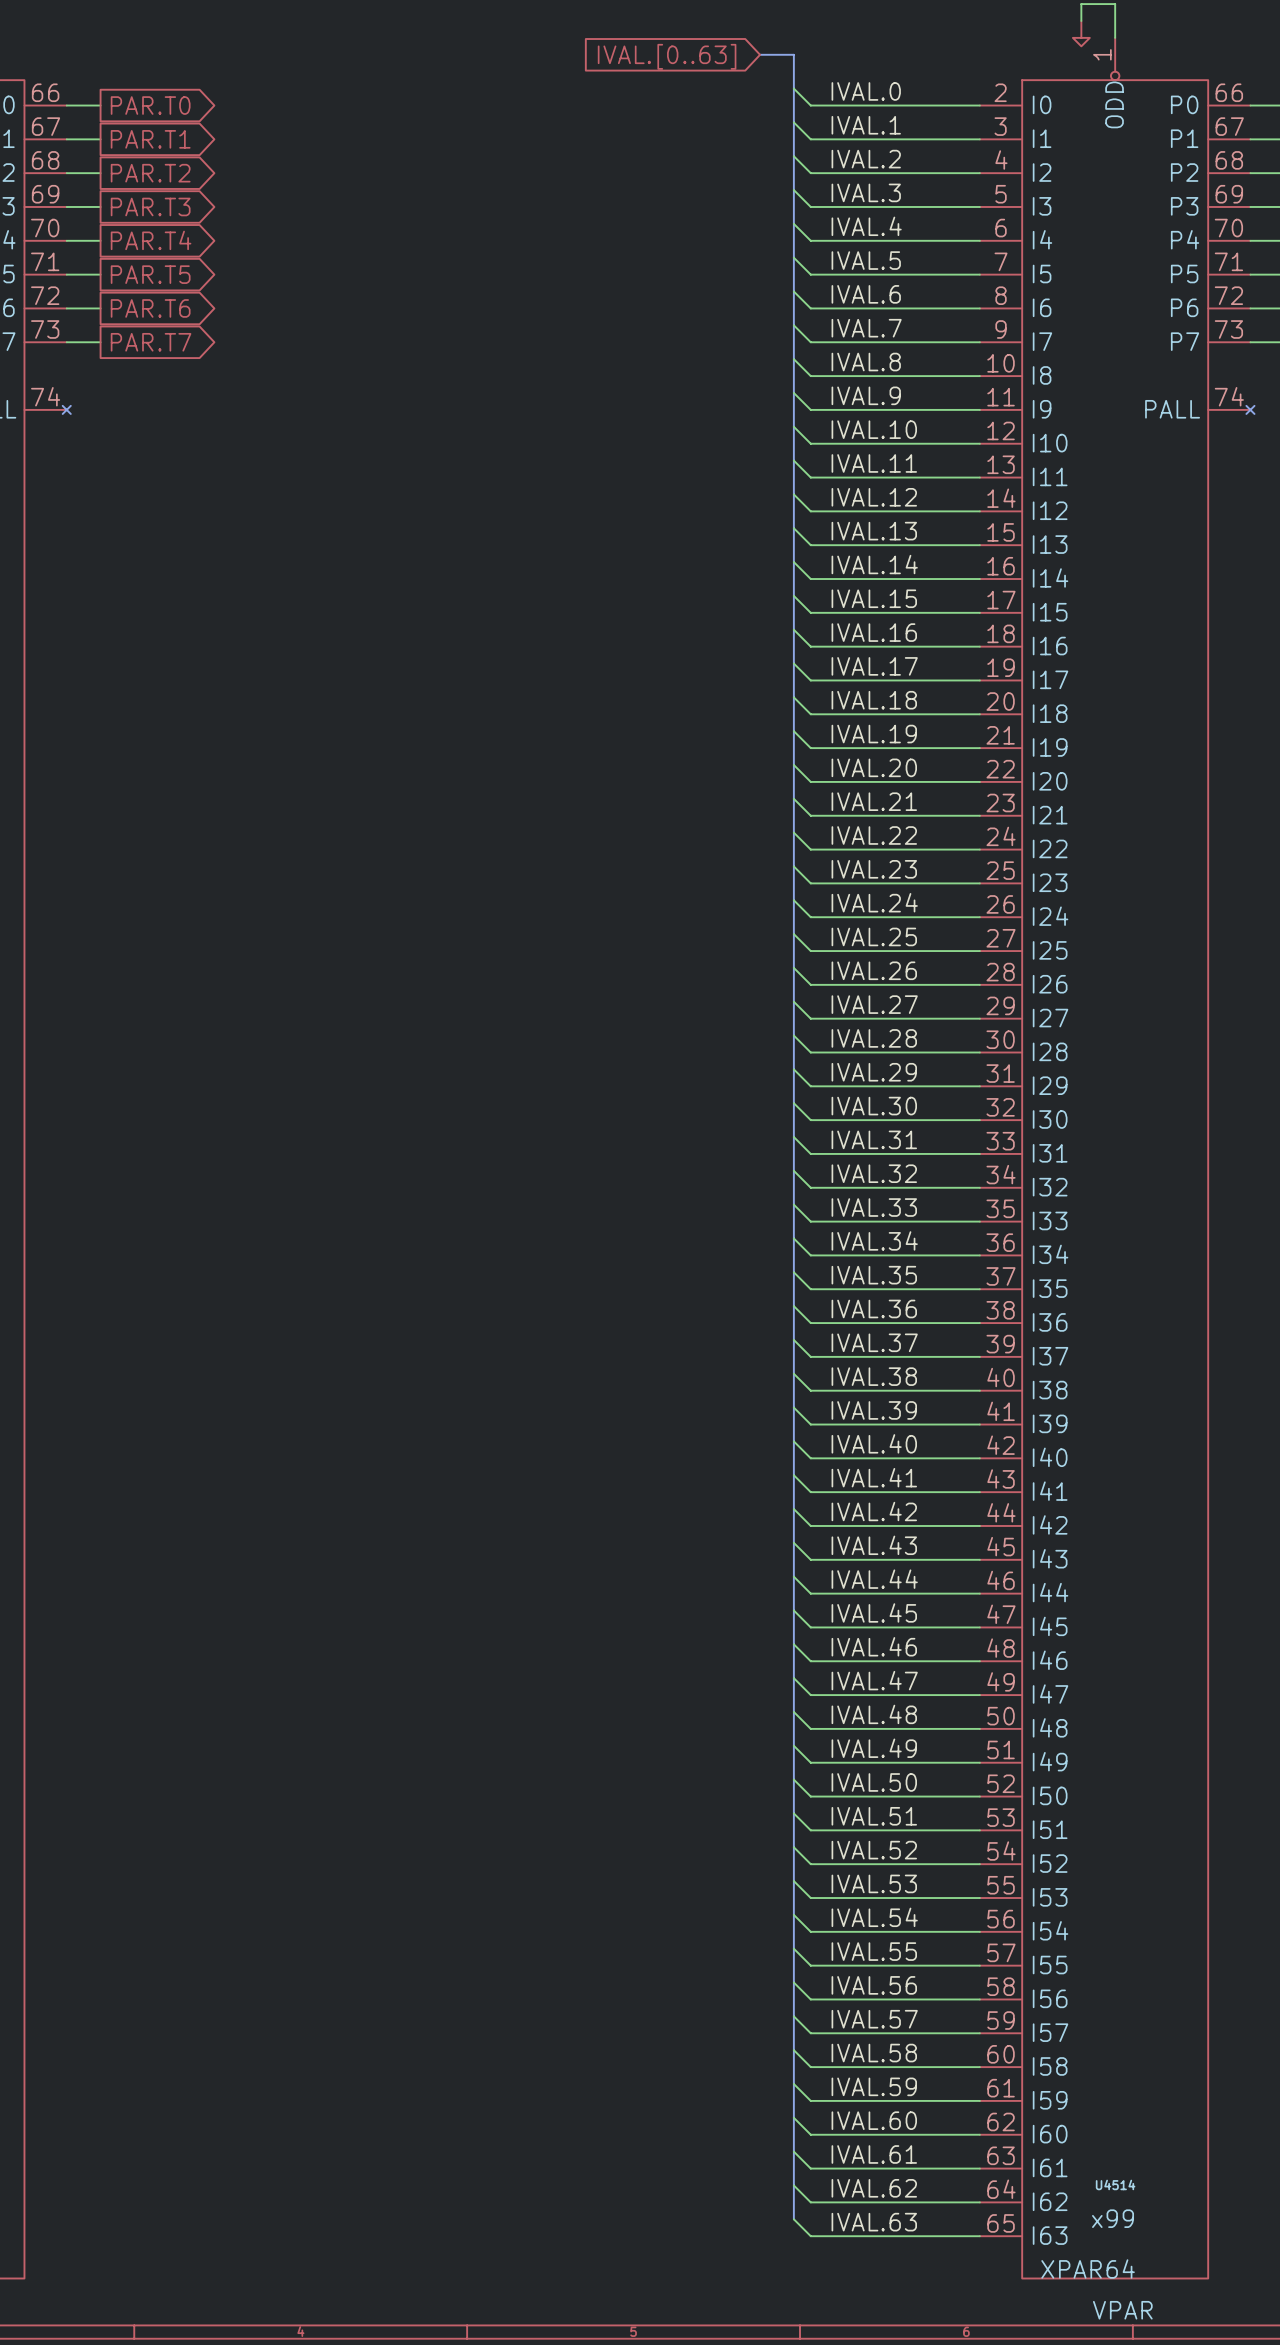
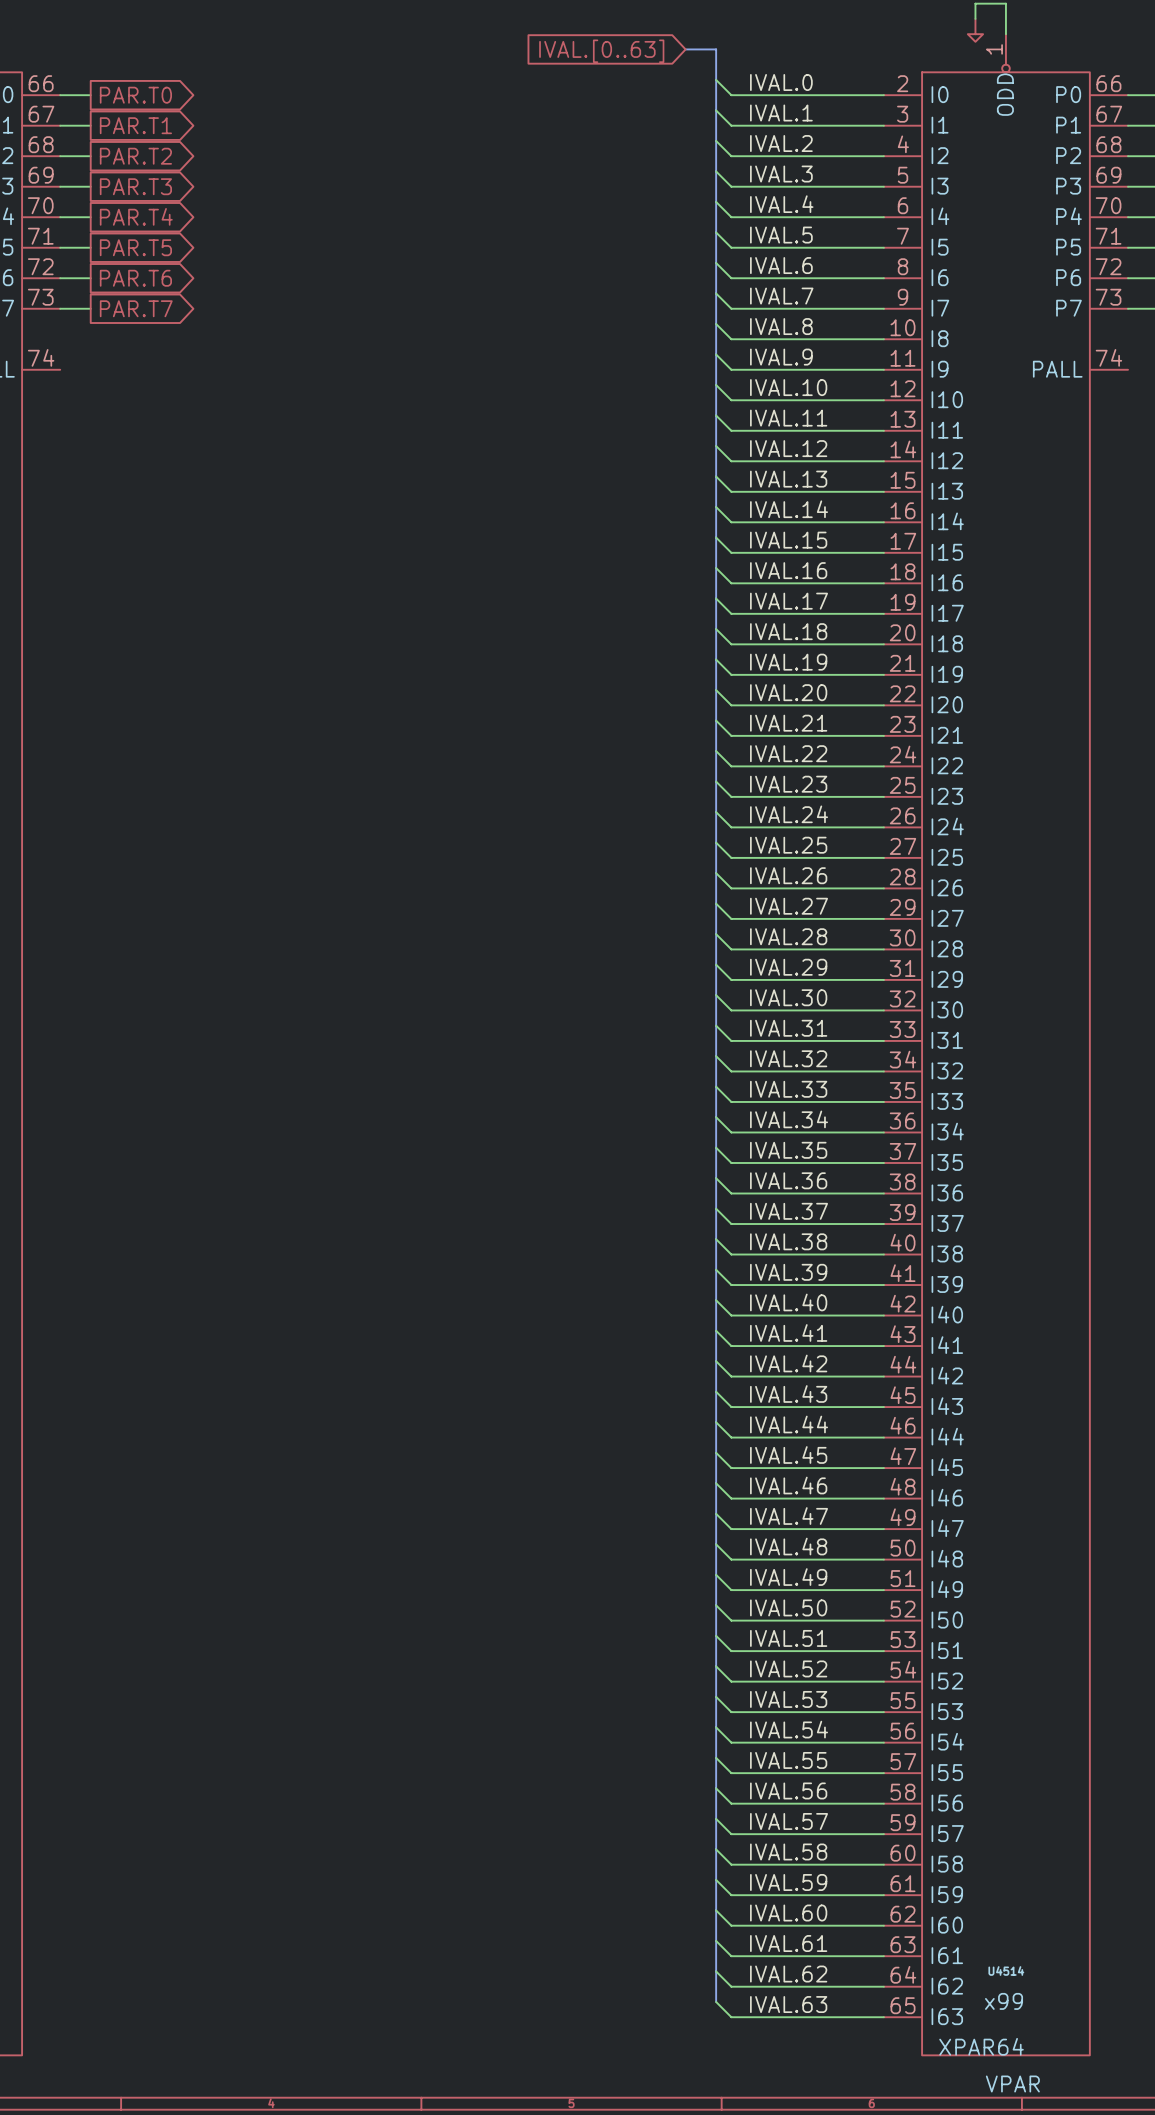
no-connect mark: (66, 409) -> none
no-connect mark: (1250, 409) -> none

